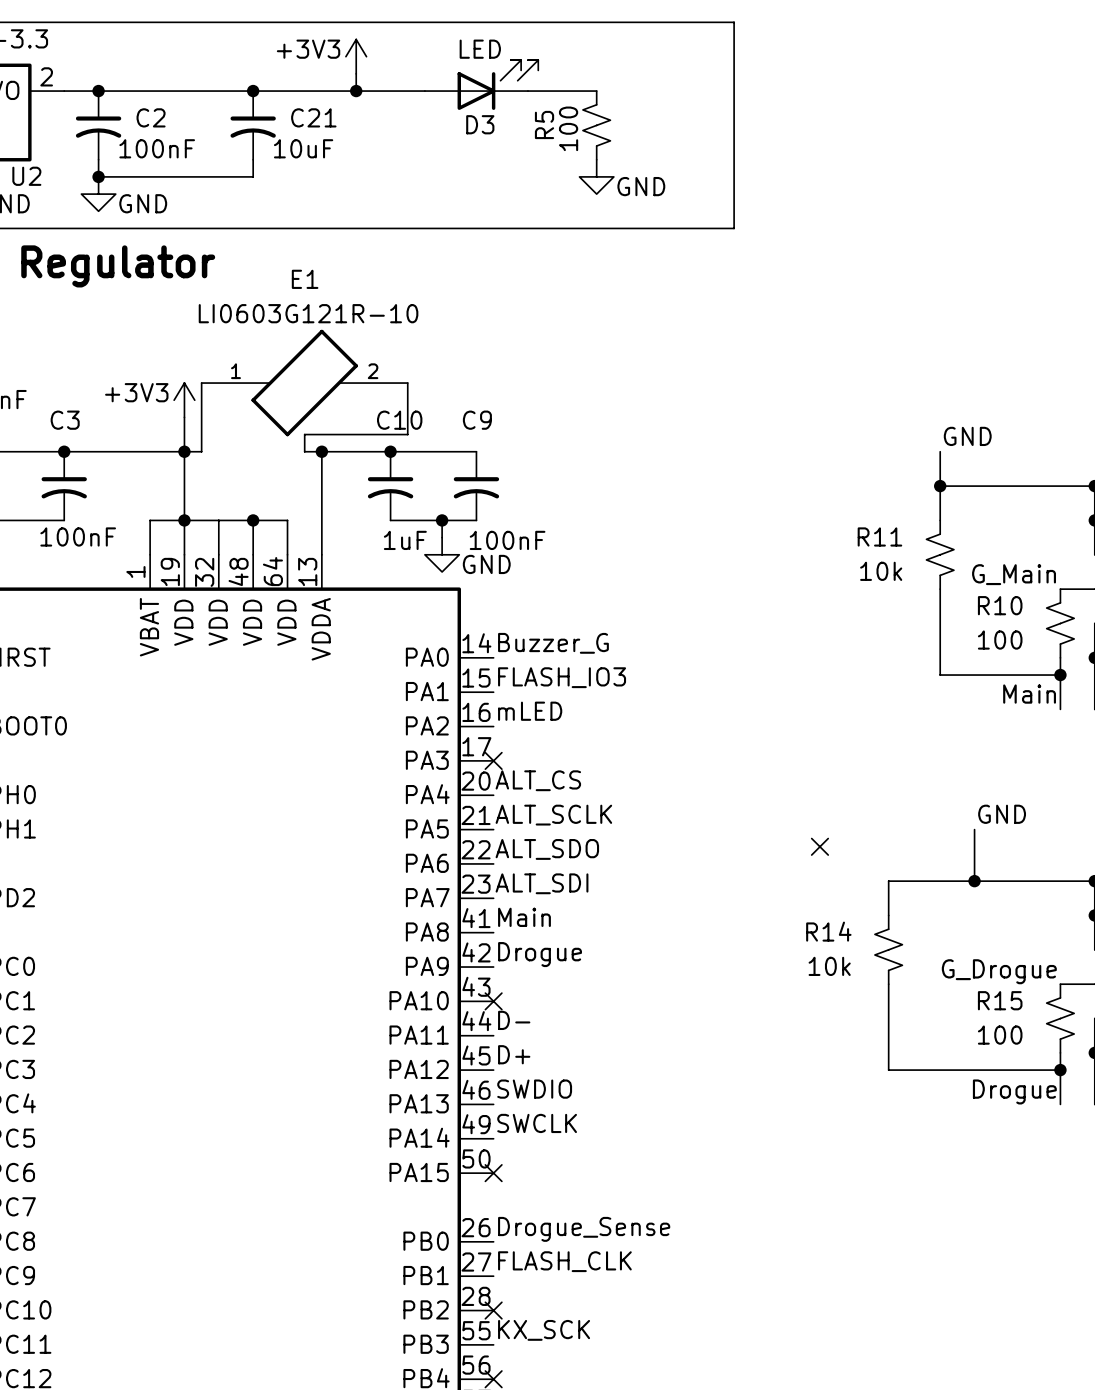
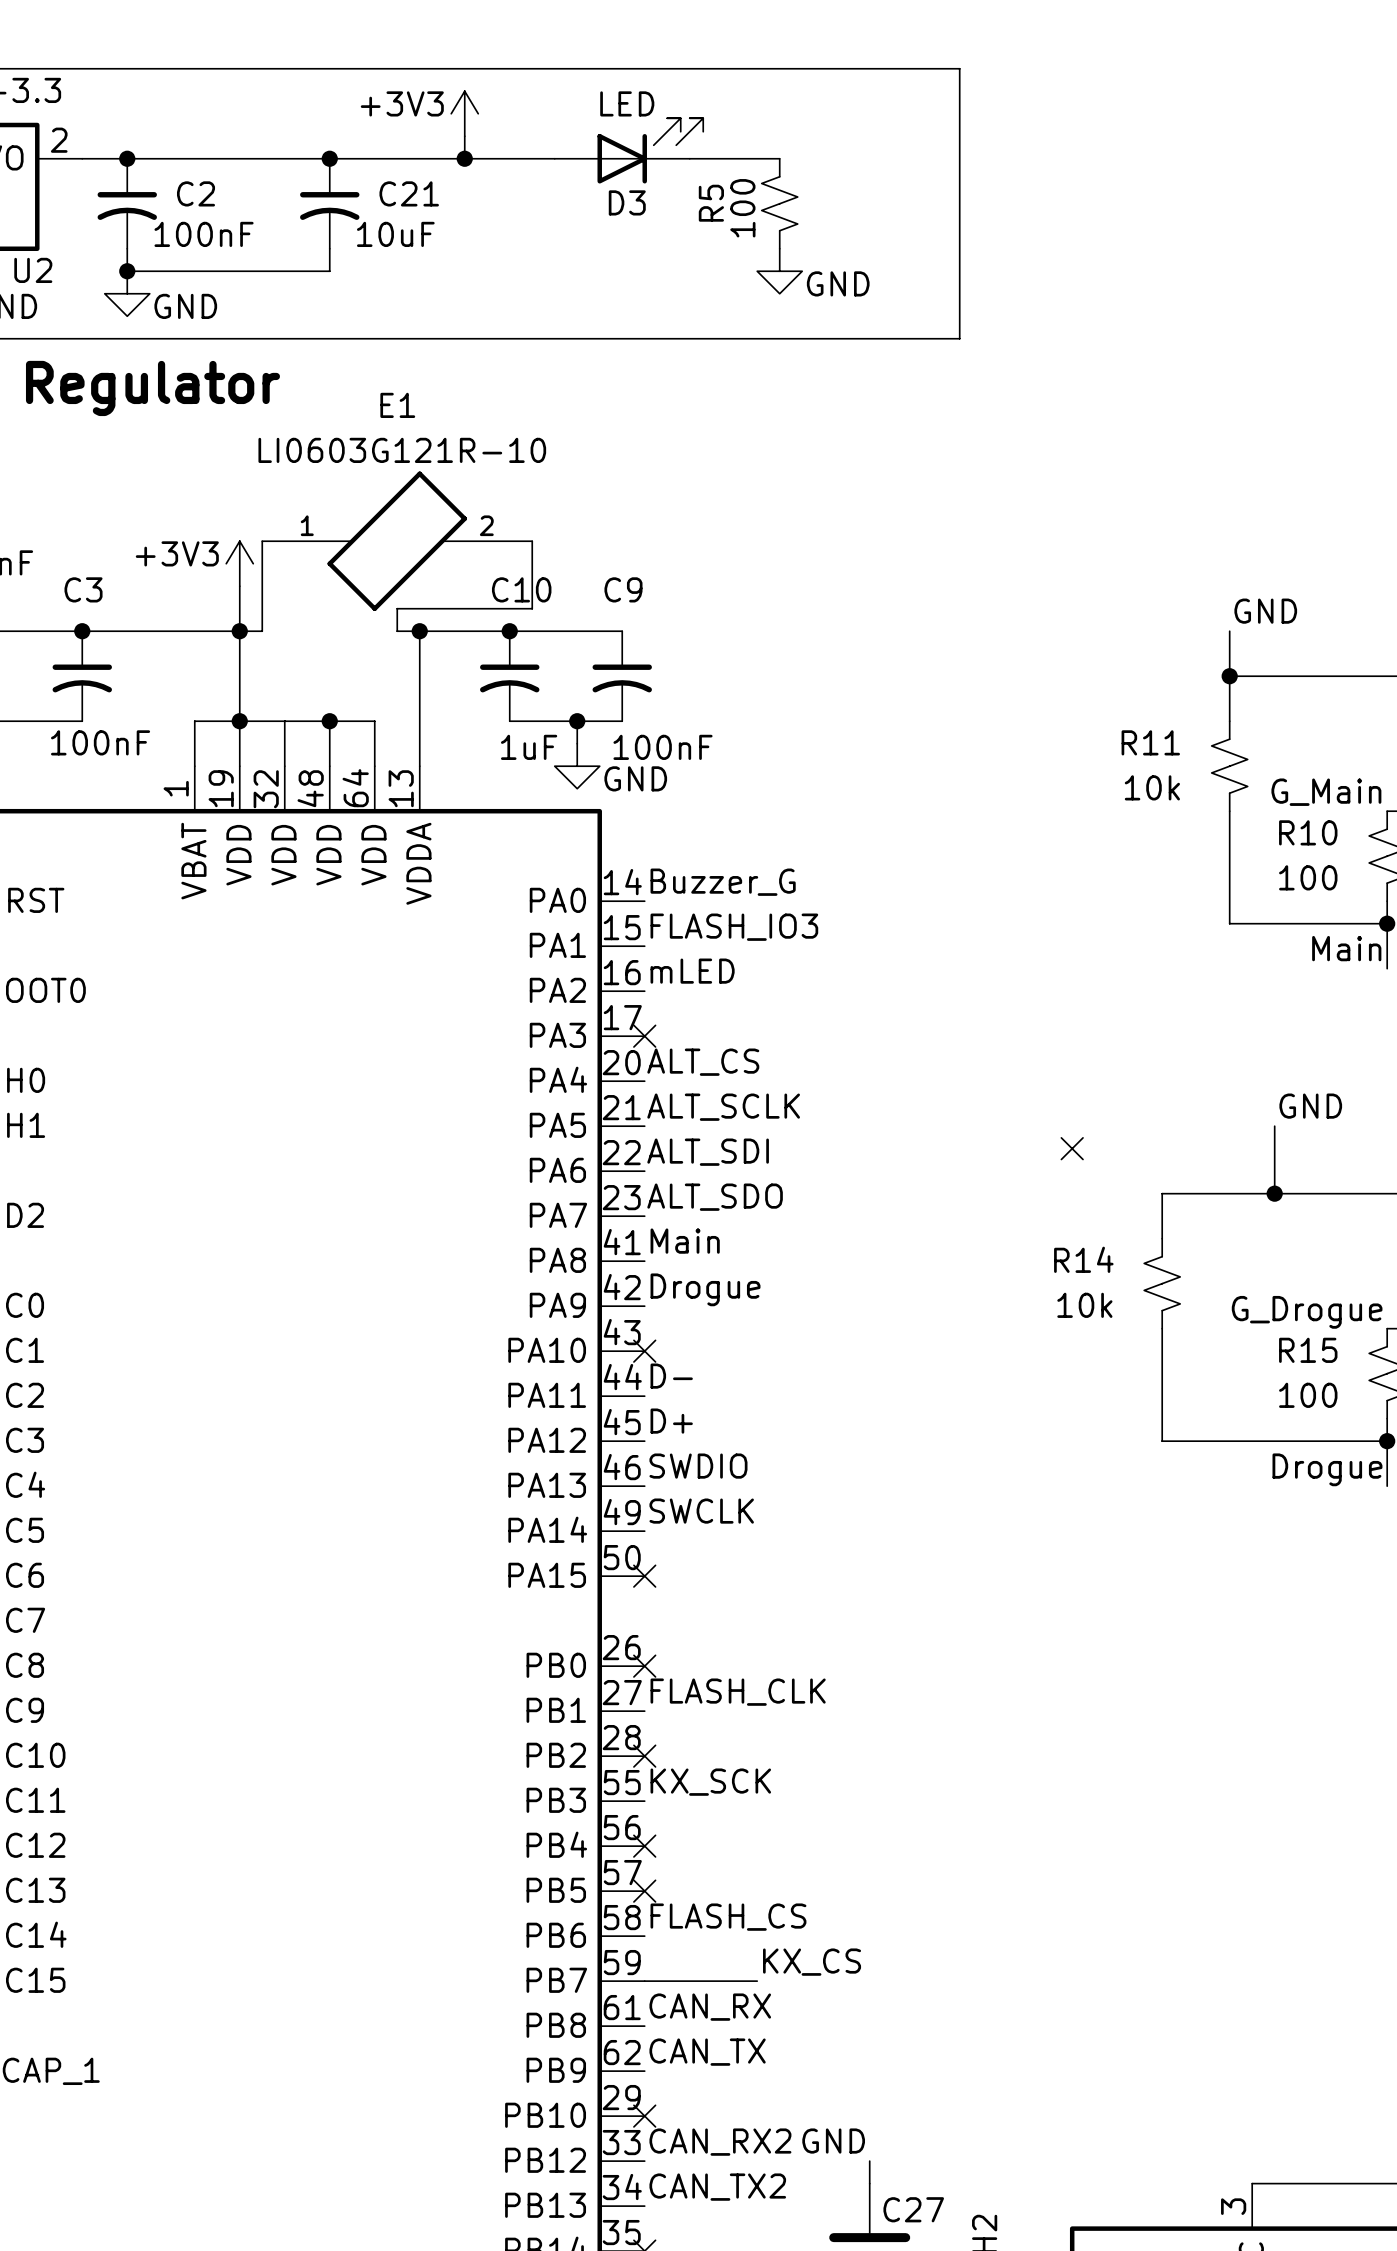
label: ALT_SDO (547, 849) -> ALT_SDI (708, 1152)
label: ALT_SDI (542, 883) -> ALT_SDO (715, 1197)
label: Drogue_Sense (584, 1229) -> none
no-connect mark: none -> (644, 1666)

